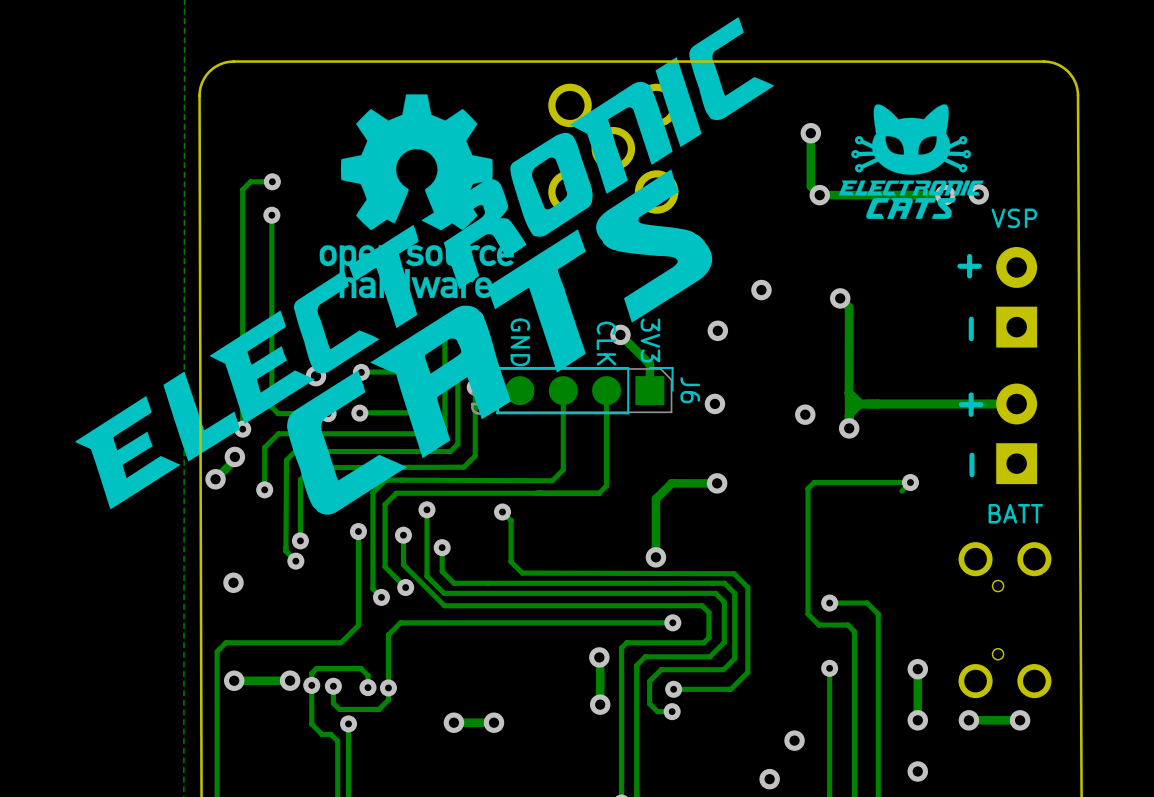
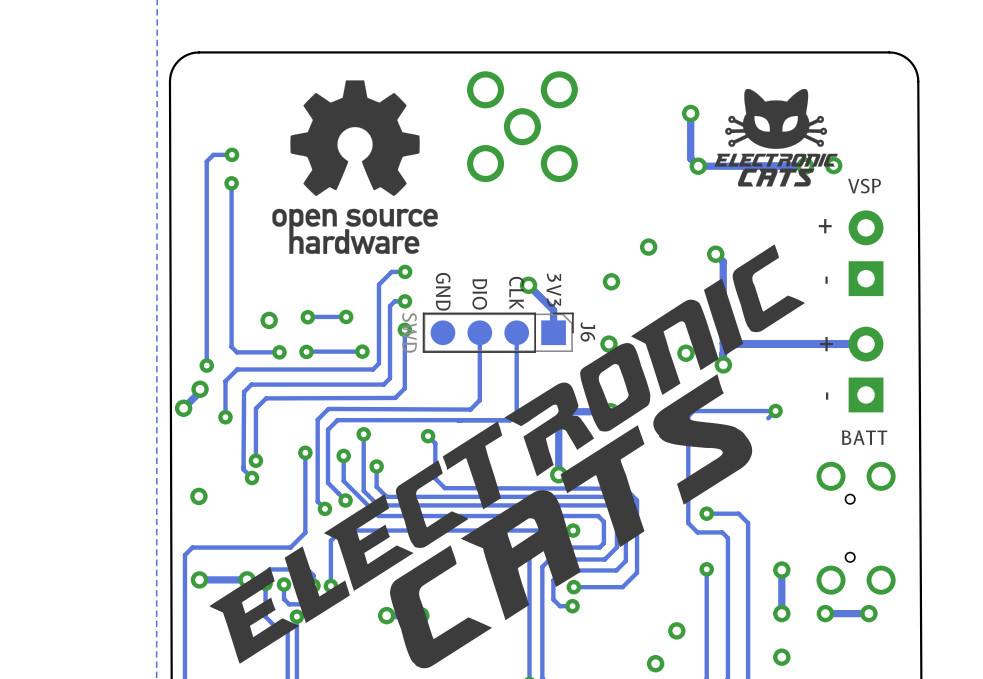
drawing position: (424, 265) -> (507, 456)

